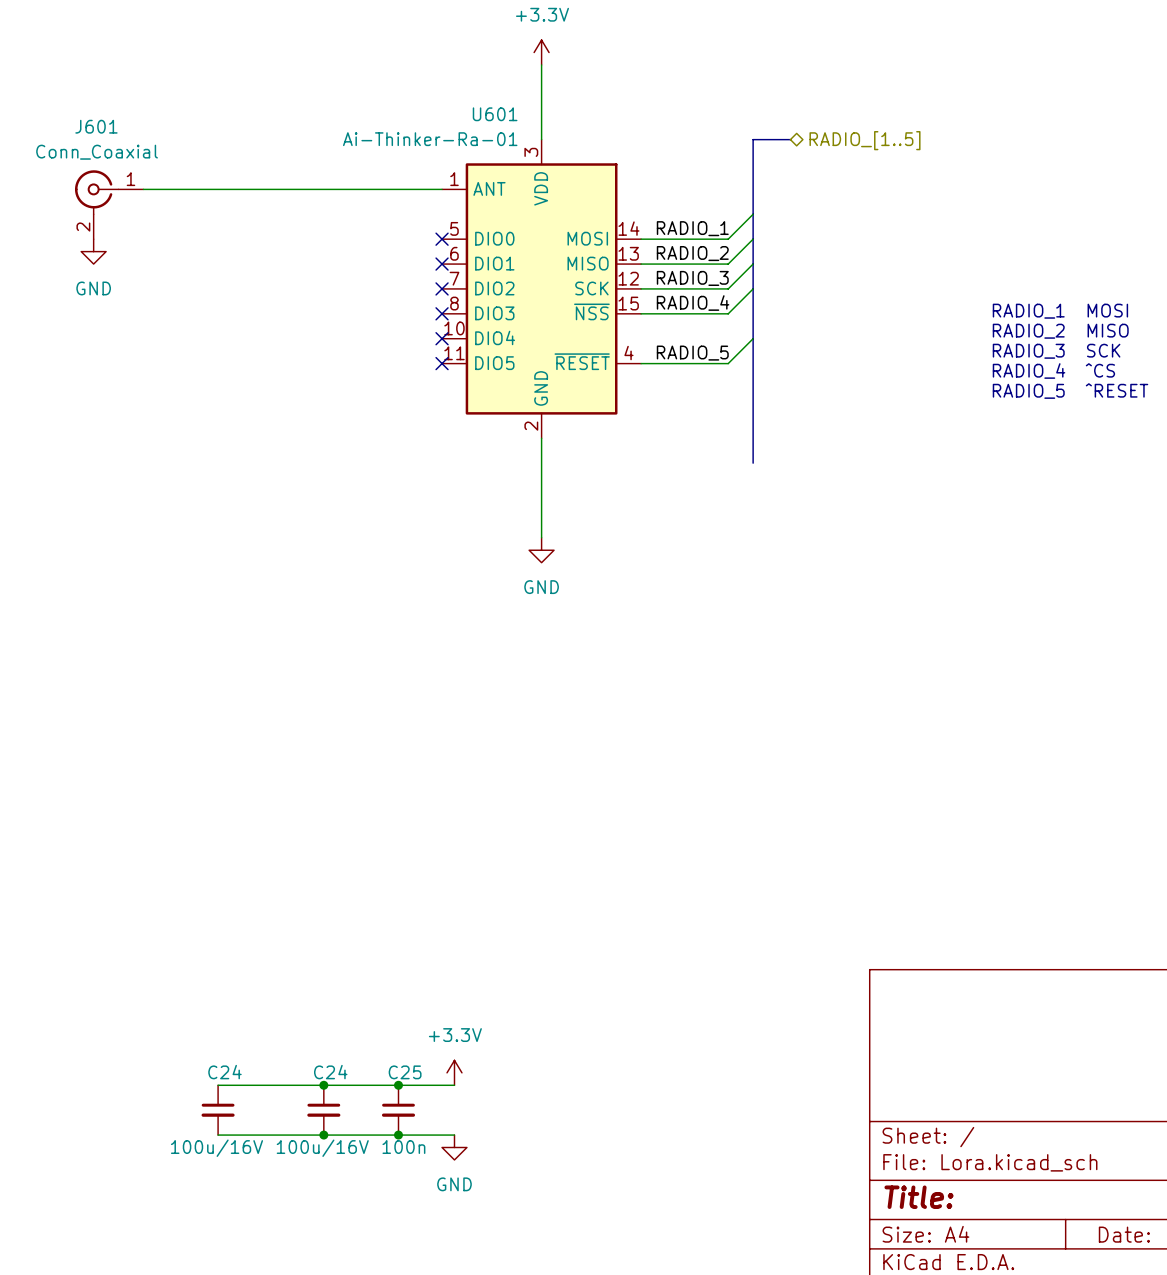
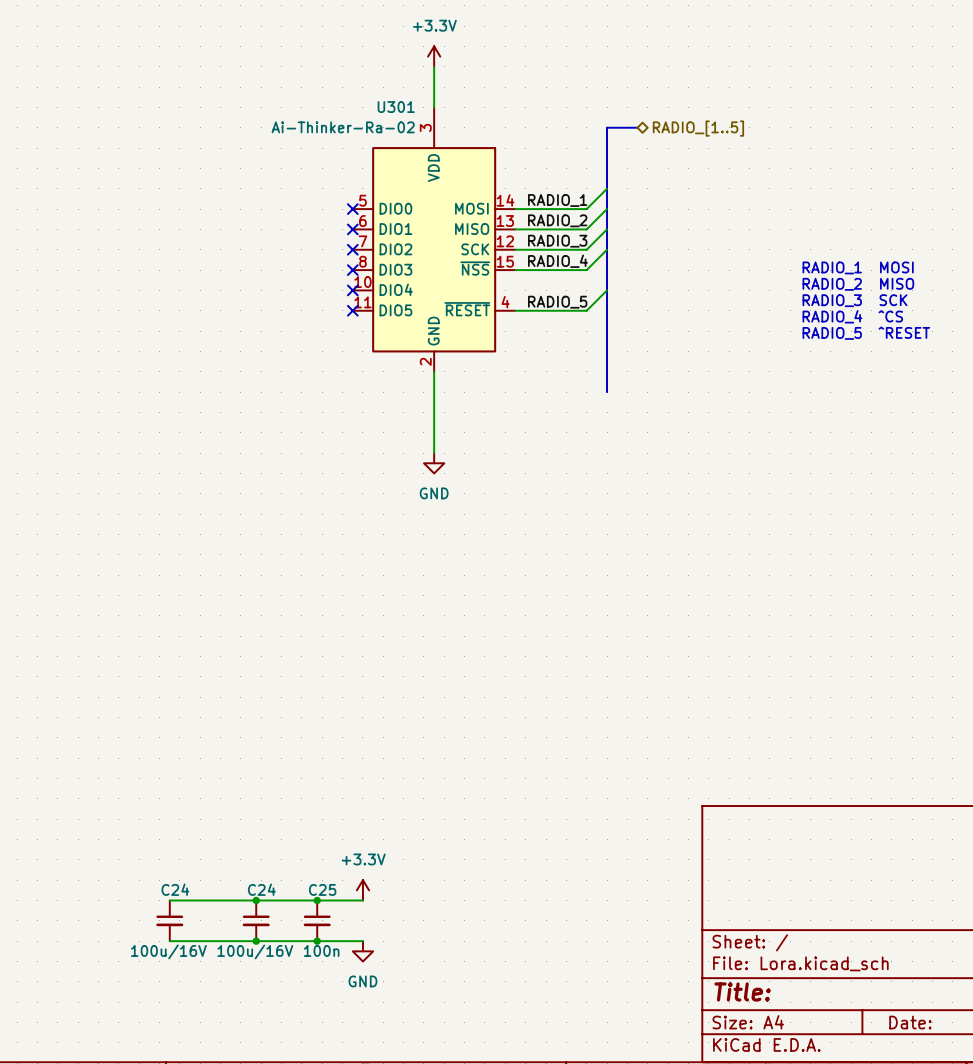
wire: (143, 189) (442, 189) -> none
J601: Conn_Coaxial (109, 204) -> none
power symbol: GND (93, 251) -> none
U301: none -> Ai-Thinker-Ra-02 (434, 239)
U601: Ai-Thinker-Ra-01 (541, 288) -> none

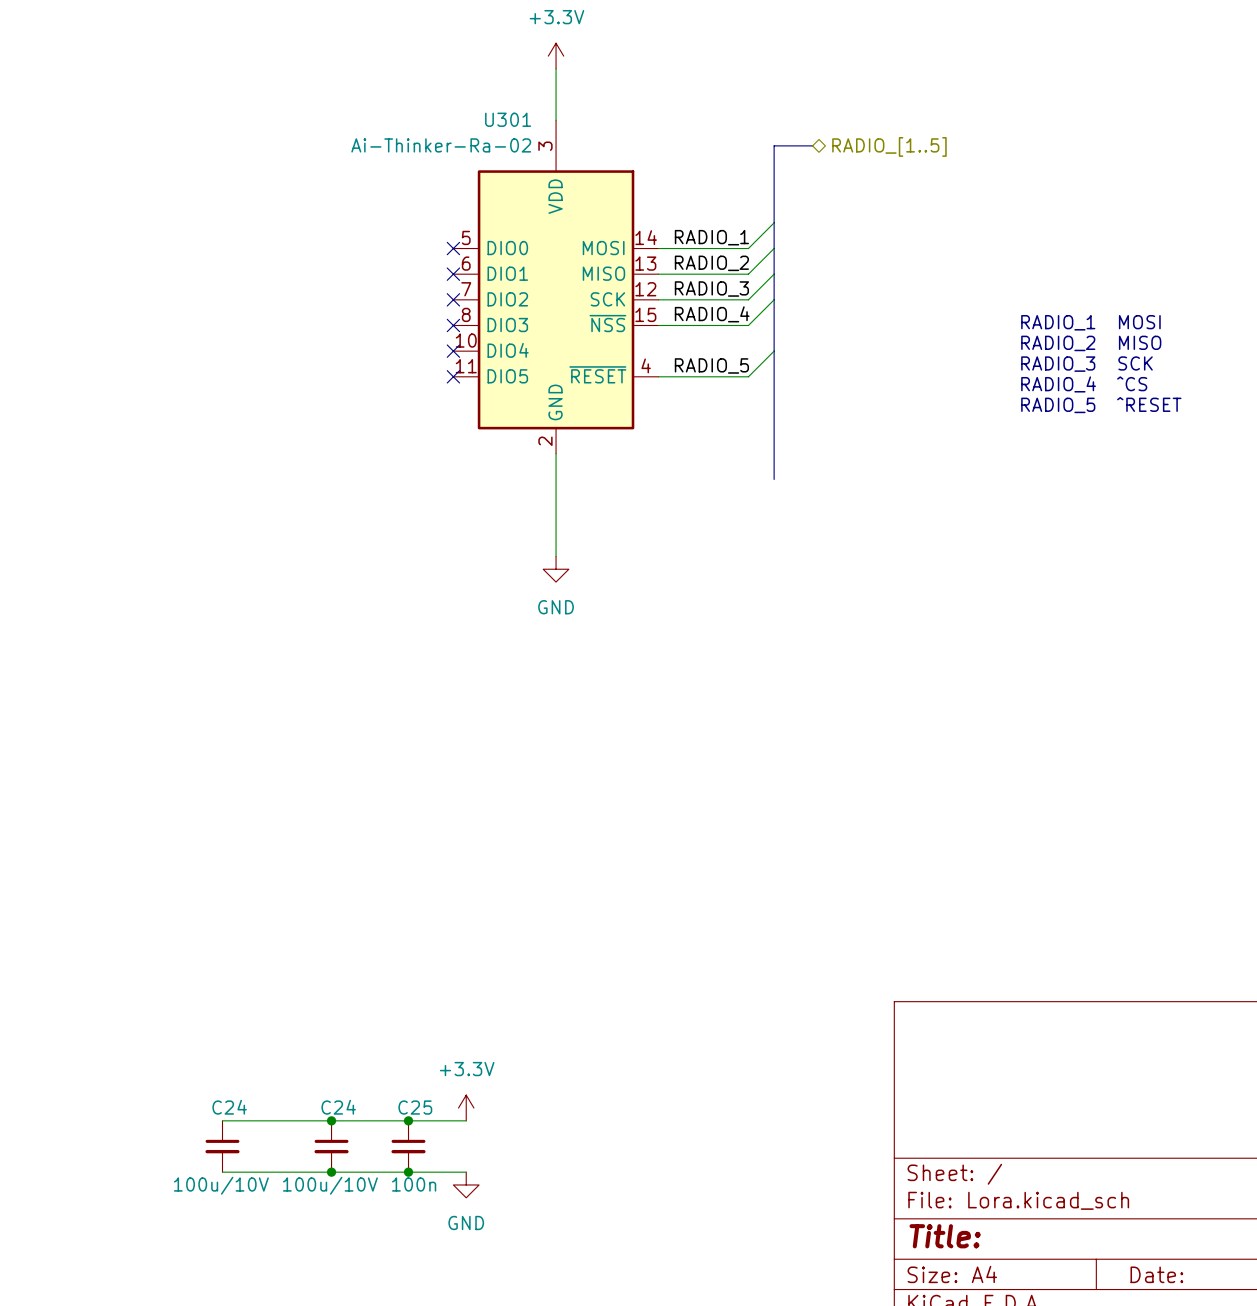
C24 value: 100u/16V (168, 951) -> 100u/10V (221, 1185)
C24 value: 100u/16V (255, 951) -> 100u/10V (330, 1185)

